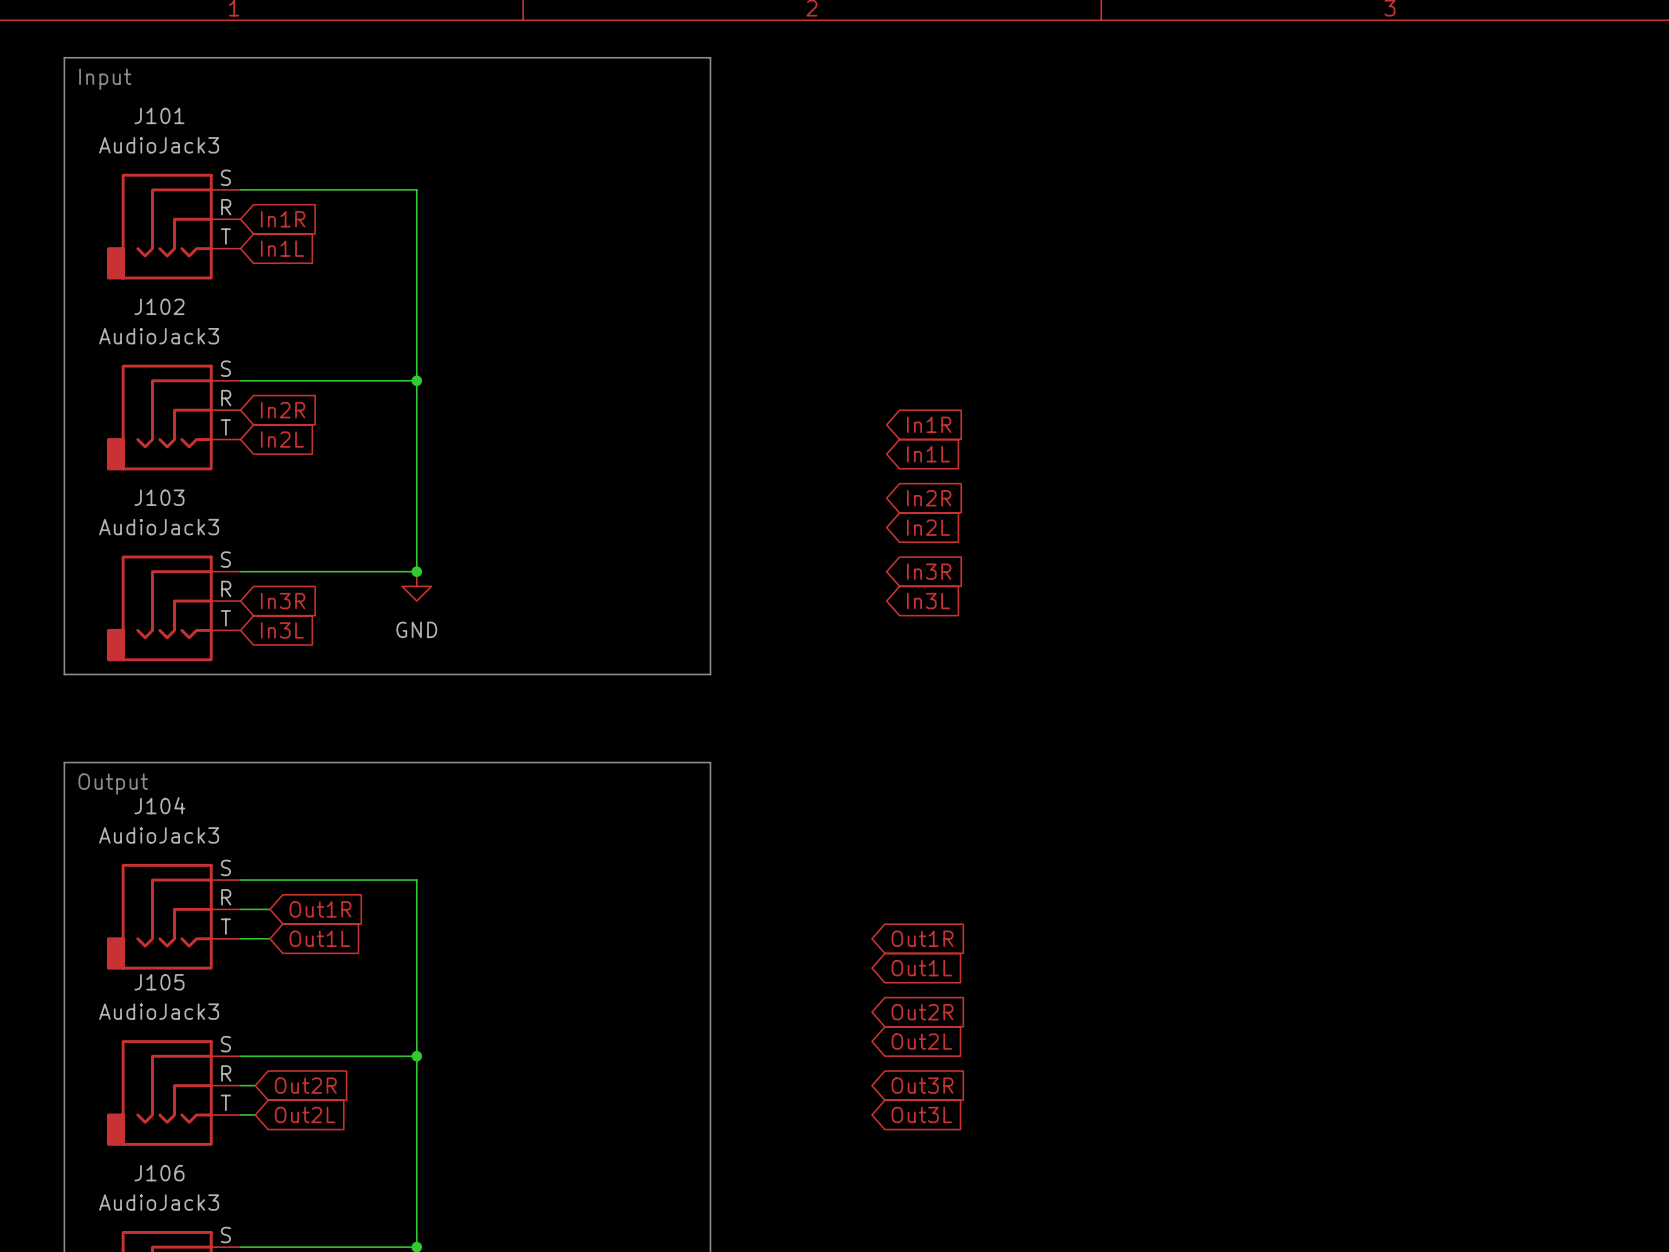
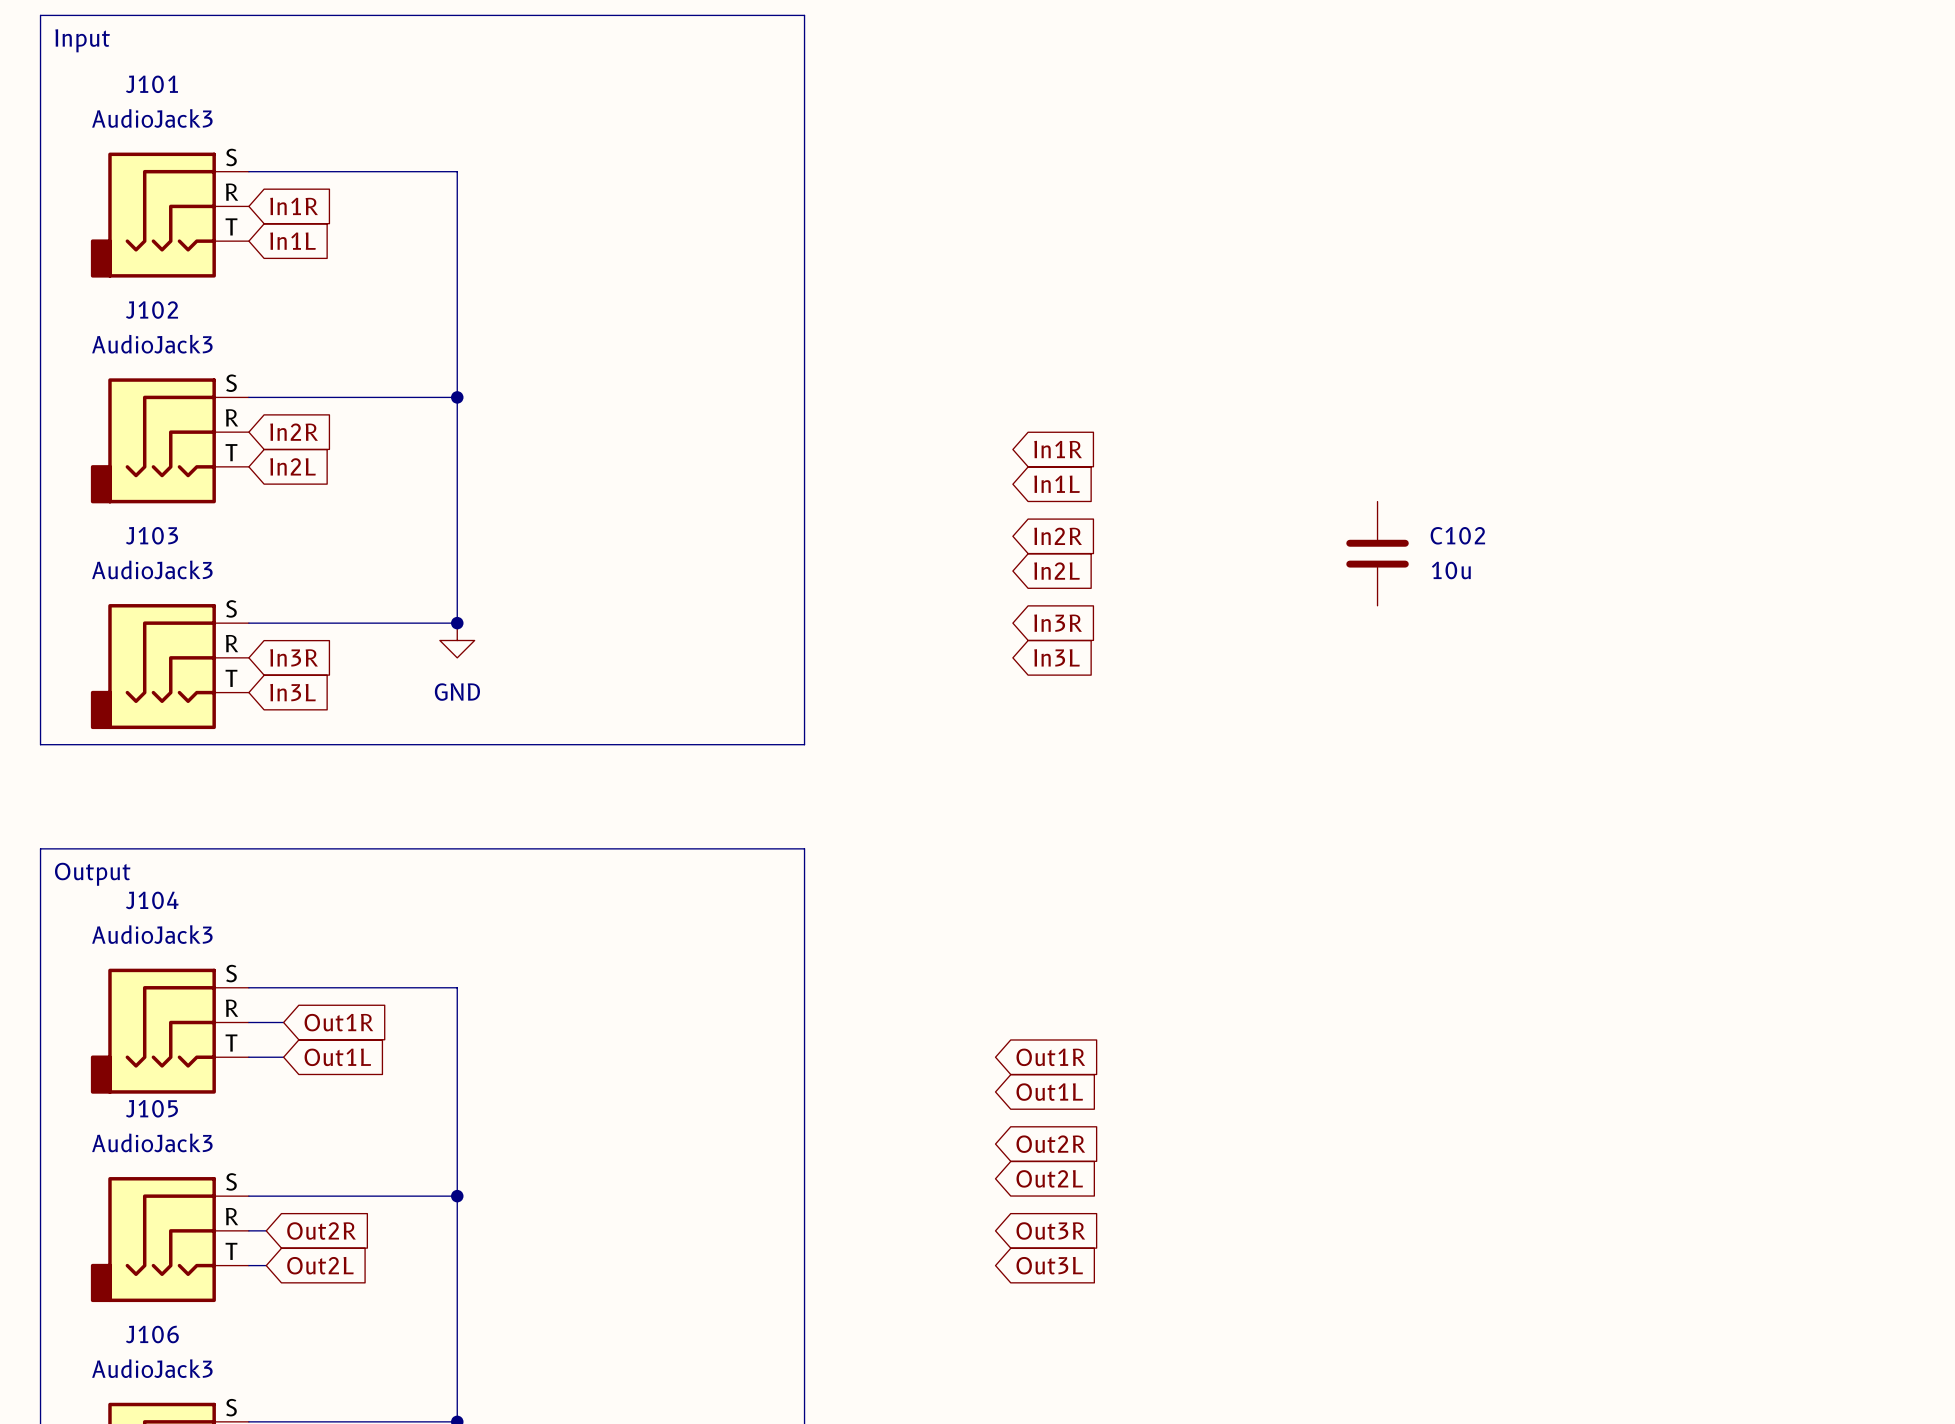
C102: none -> 10u (1377, 553)

